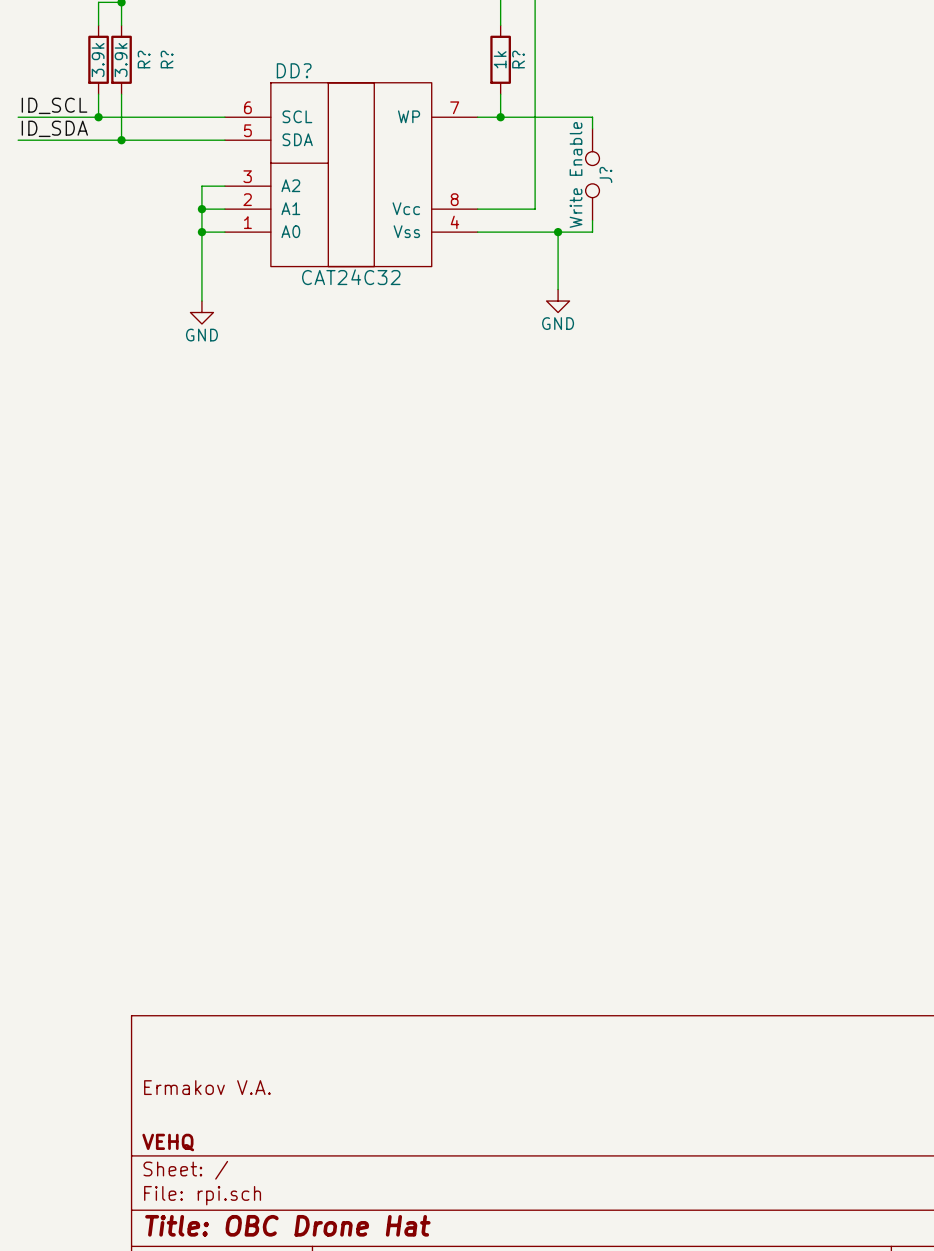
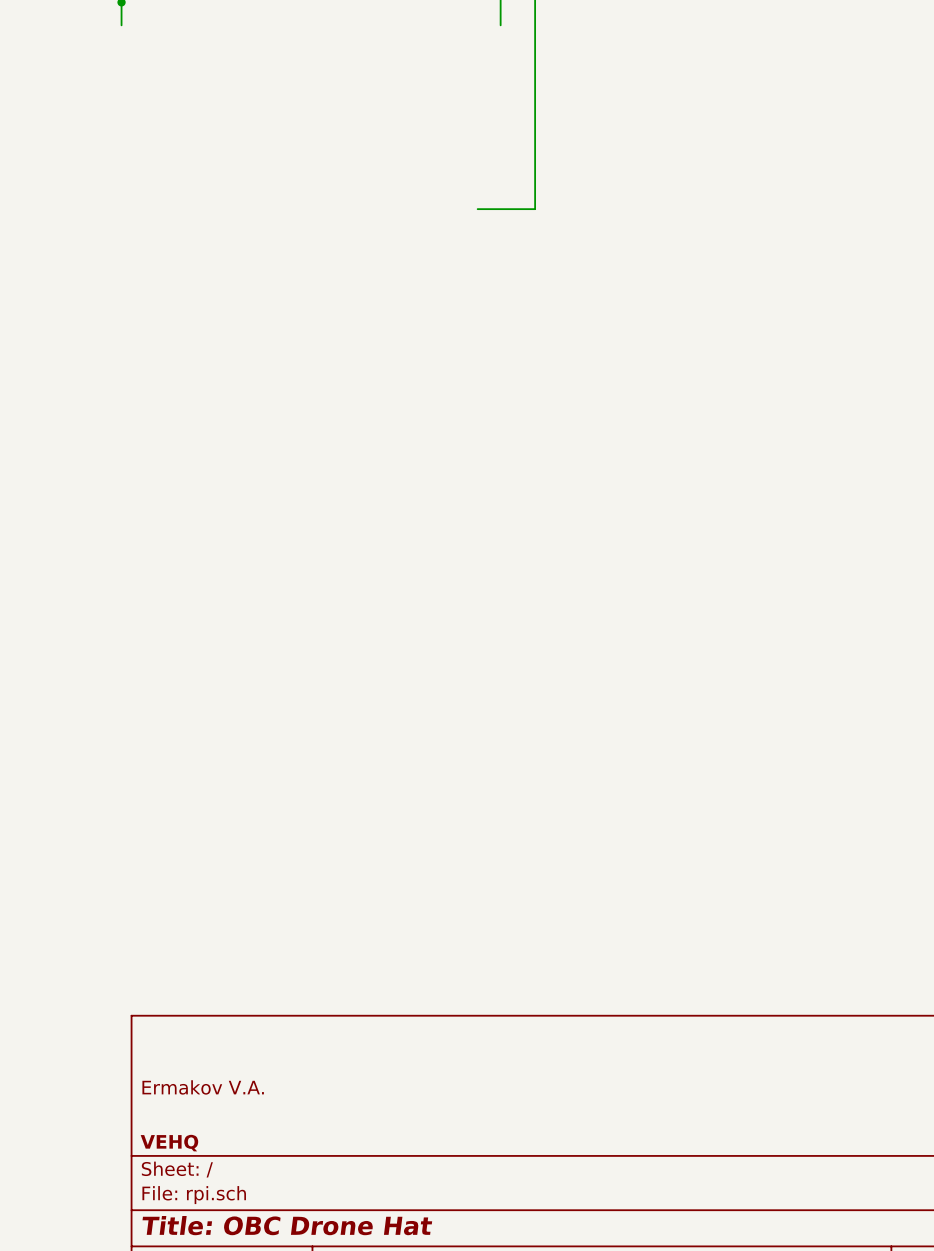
wire: (121, 2) (98, 2) (98, 25) -> none
R?: 3.9k (98, 59) -> none
R?: 3.9k (121, 59) -> none
R?: 1k (500, 59) -> none
wire: (98, 94) (98, 117) -> none
wire: (121, 94) (121, 140) -> none
wire: (500, 94) (500, 117) -> none
label: ID_SCL (54, 105) -> none
wire: (18, 117) (224, 117) -> none
junction: (98, 117) -> none
wire: (477, 117) (592, 117) (592, 128) -> none
junction: (500, 117) -> none
label: ID_SDA (54, 128) -> none
wire: (18, 140) (224, 140) -> none
junction: (121, 140) -> none
DD?: CAT24C32 (351, 174) -> none
J?: Write Enable (592, 174) -> none
wire: (224, 186) (201, 186) (201, 301) -> none
wire: (201, 209) (224, 209) -> none
junction: (201, 209) -> none
wire: (592, 220) (592, 232) (477, 232) -> none
wire: (201, 232) (224, 232) -> none
junction: (201, 232) -> none
wire: (558, 232) (558, 289) -> none
junction: (558, 232) -> none
power symbol: GND (558, 301) -> none
power symbol: GND (201, 312) -> none

